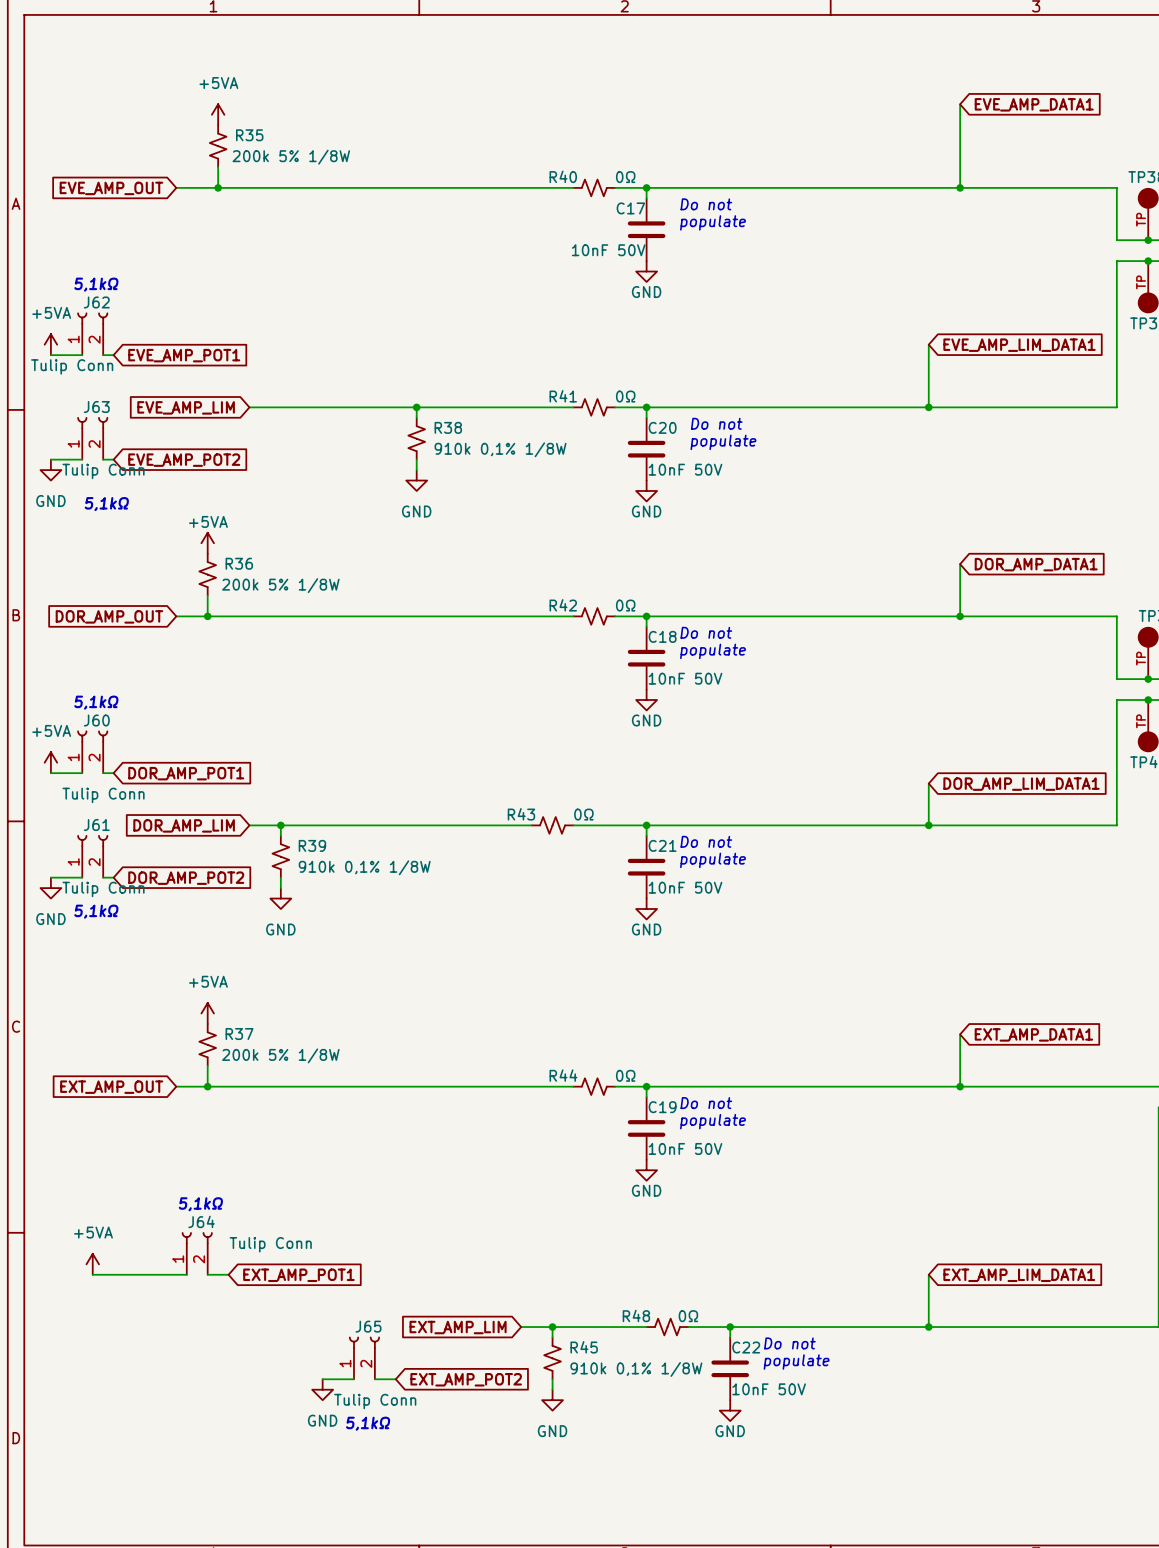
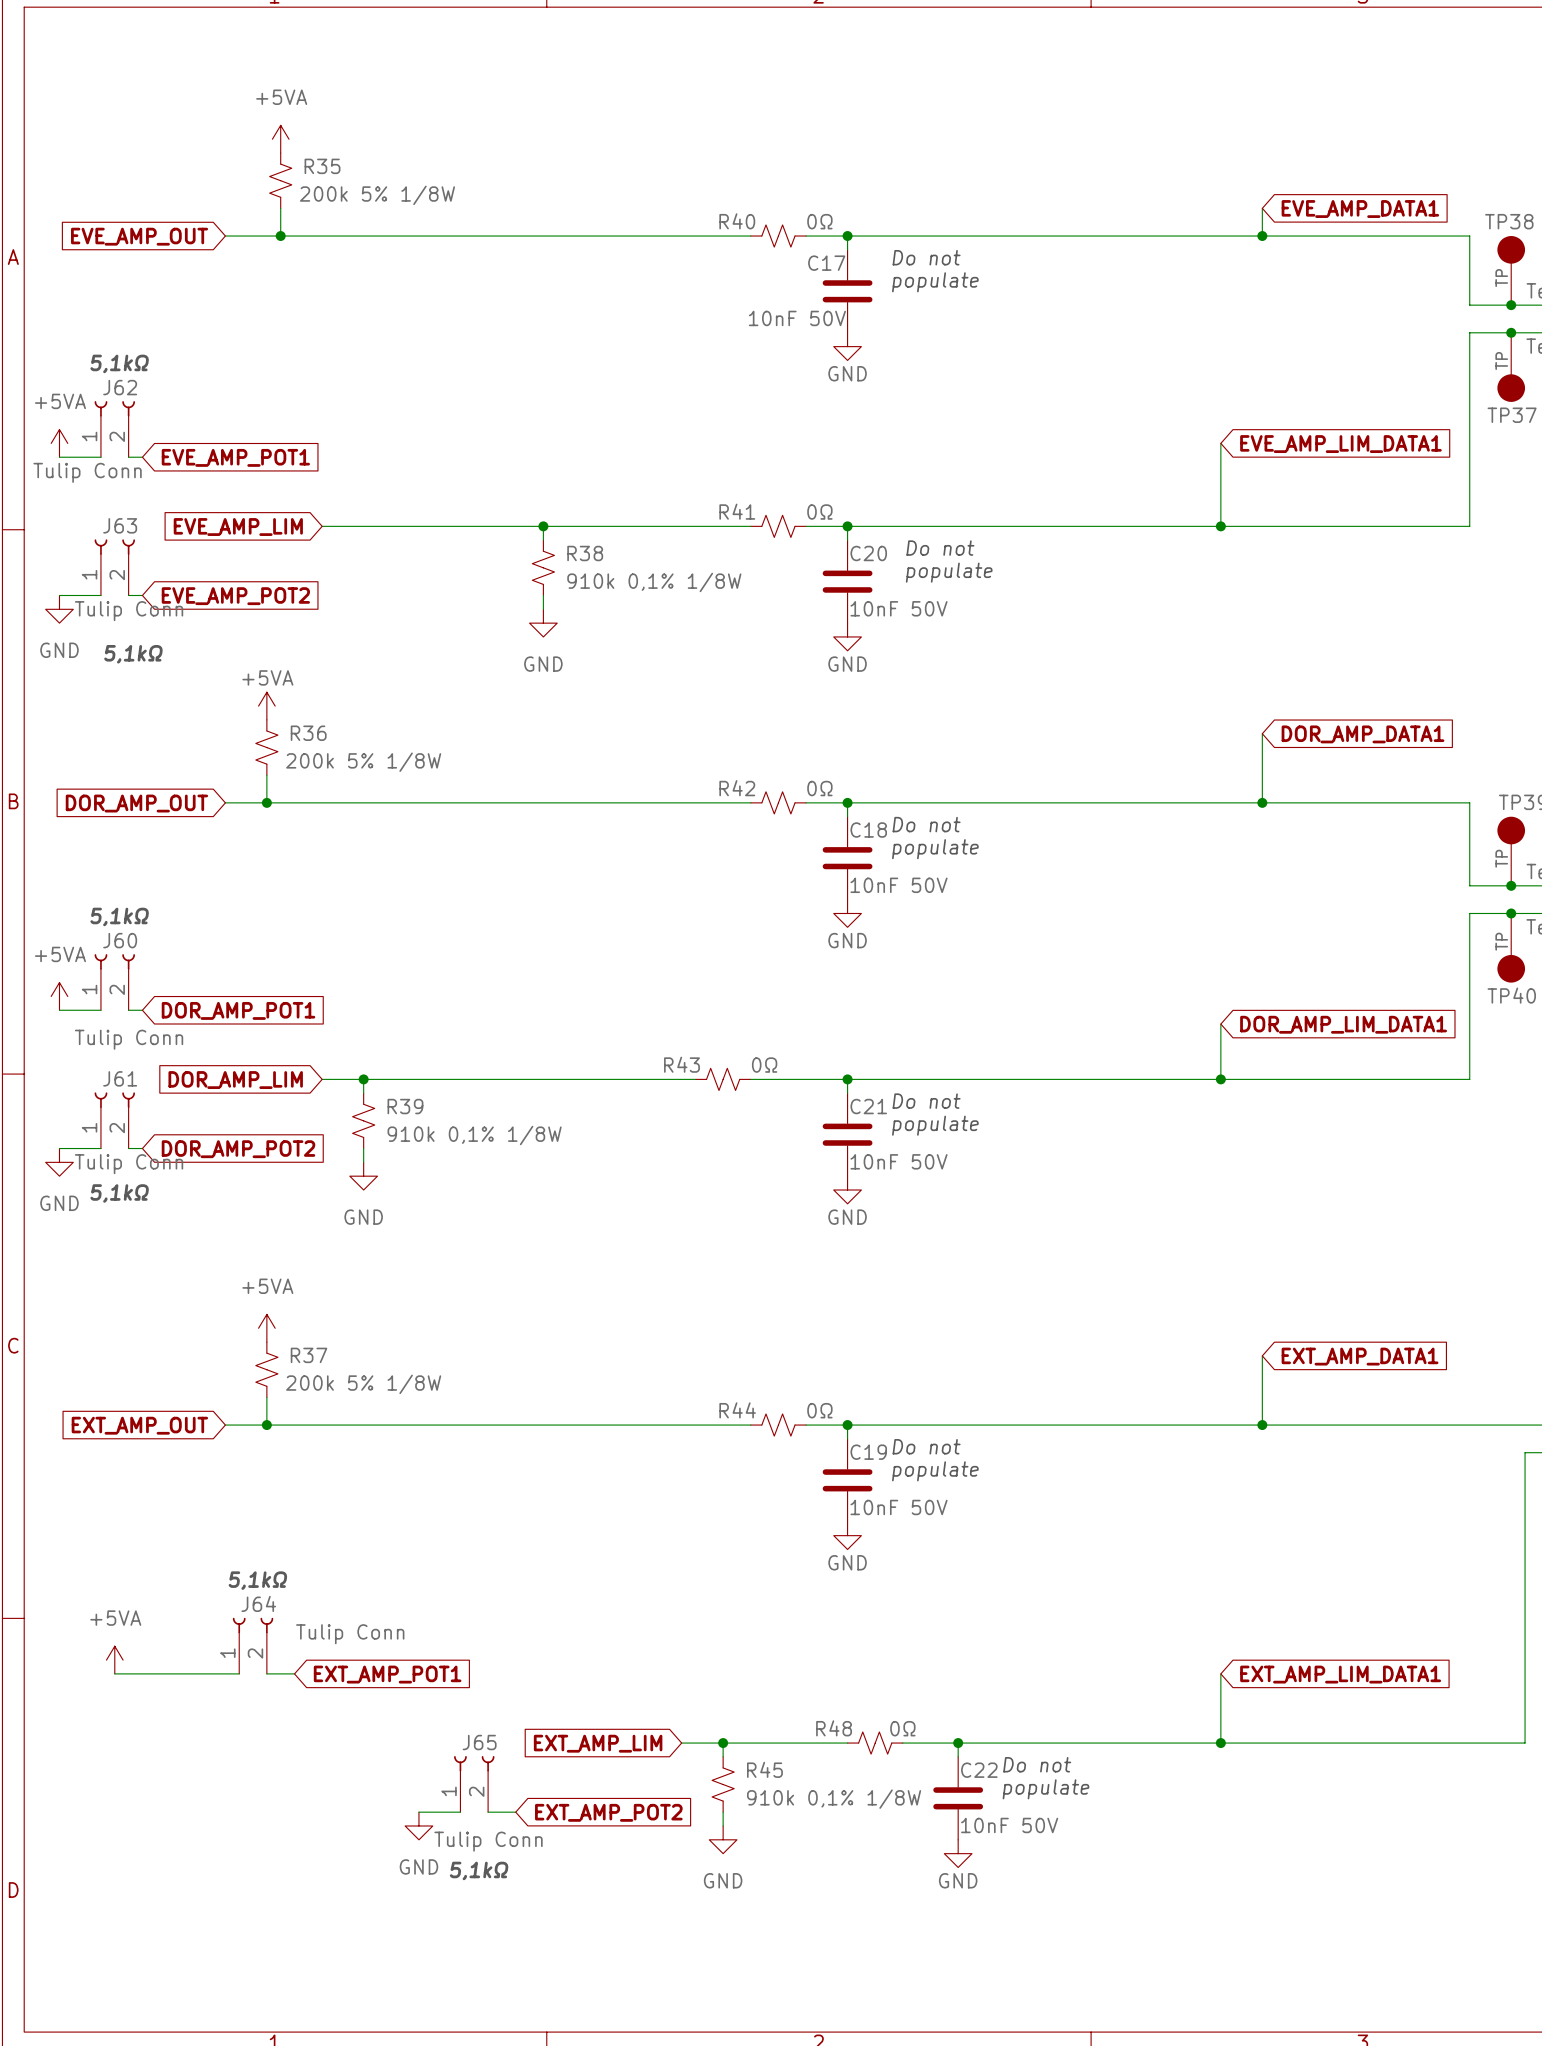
wire: (960, 104) (960, 167) -> none
global label position: EVE_AMP_DATA1 (1034, 104) -> EVE_AMP_DATA1 (1360, 209)

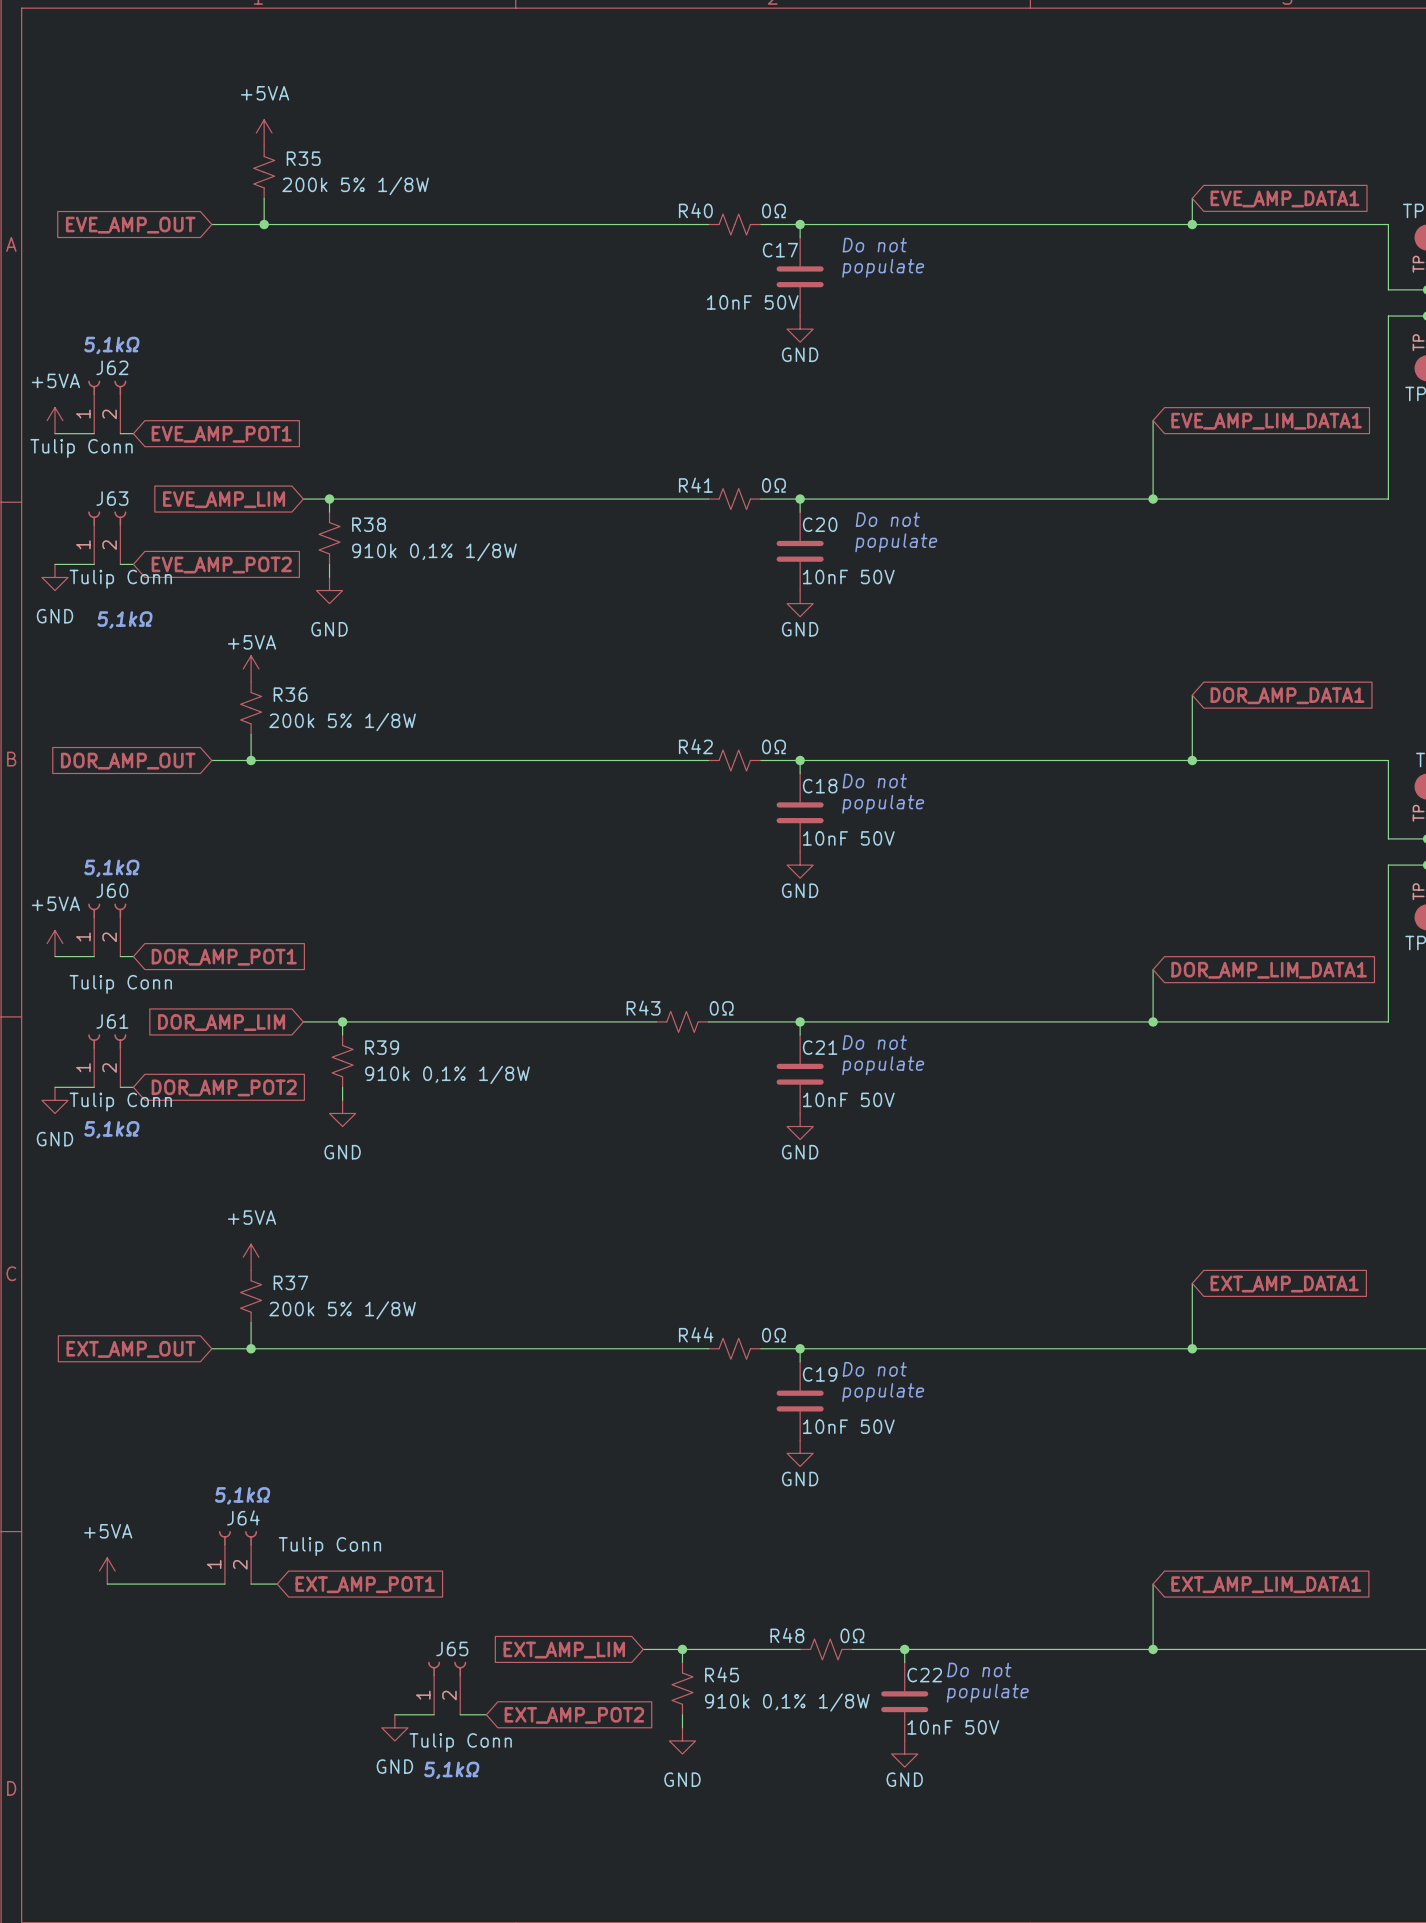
junction: none -> (329, 499)
wire: (543, 526) (543, 540) -> (329, 499) (329, 512)
junction: (543, 526) -> none
R38 position: (543, 567) -> (329, 538)
wire: (543, 595) (543, 609) -> (329, 564) (329, 577)
power symbol position: GND (543, 623) -> GND (329, 590)

